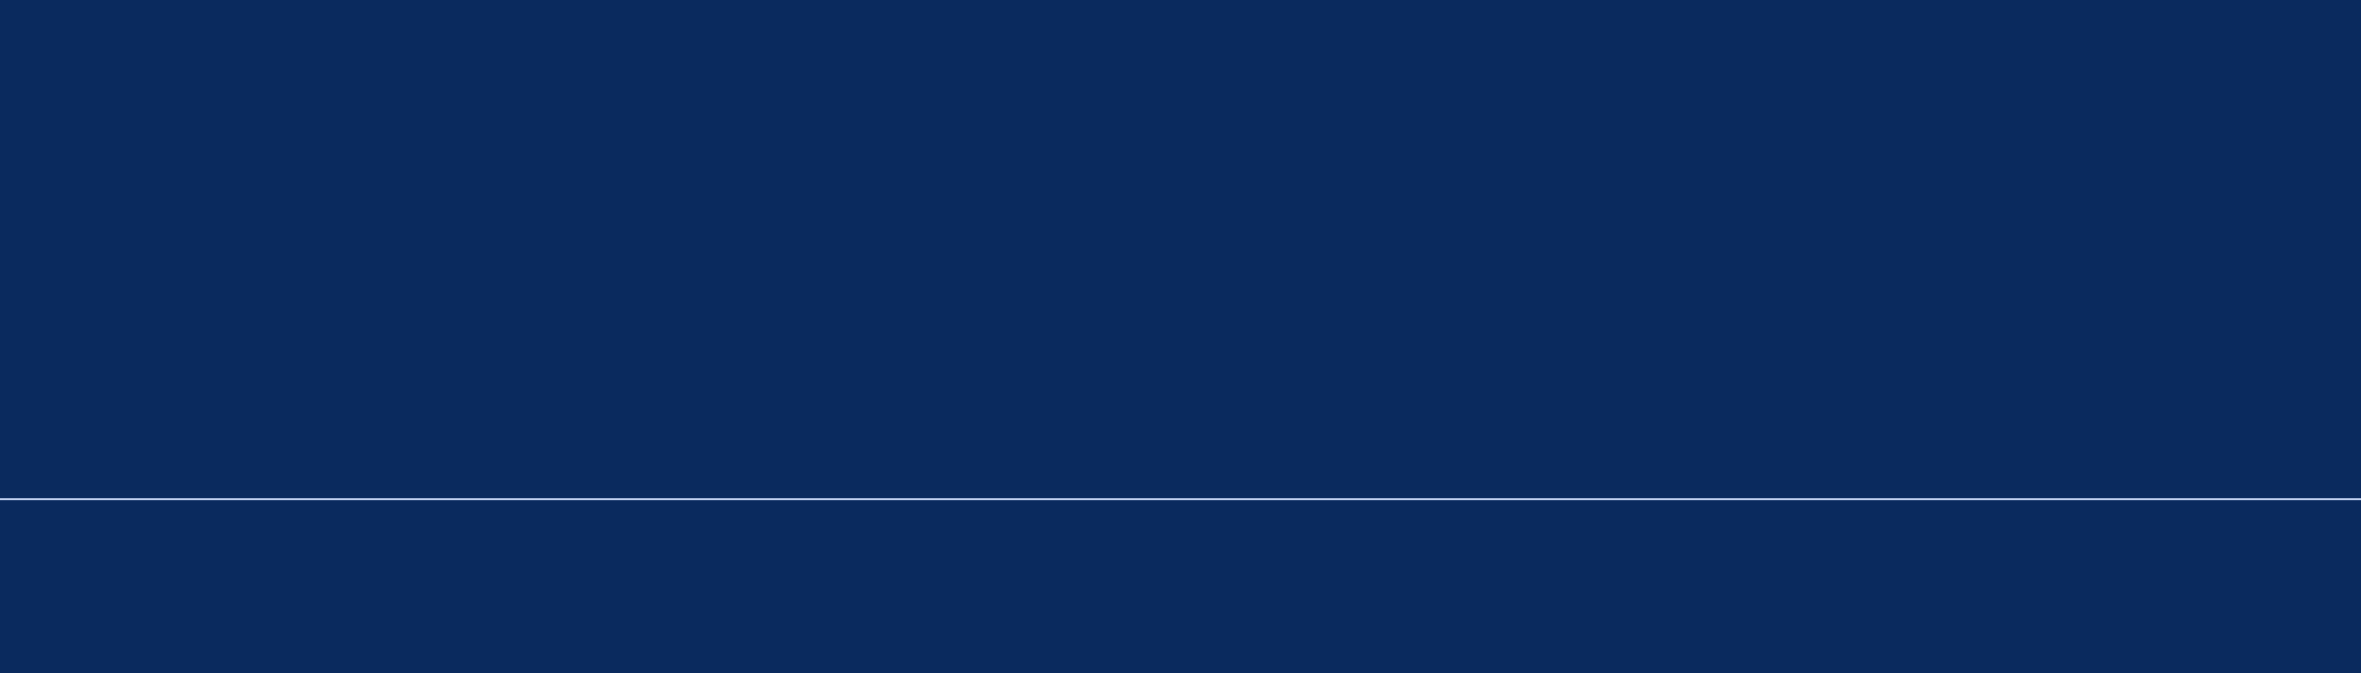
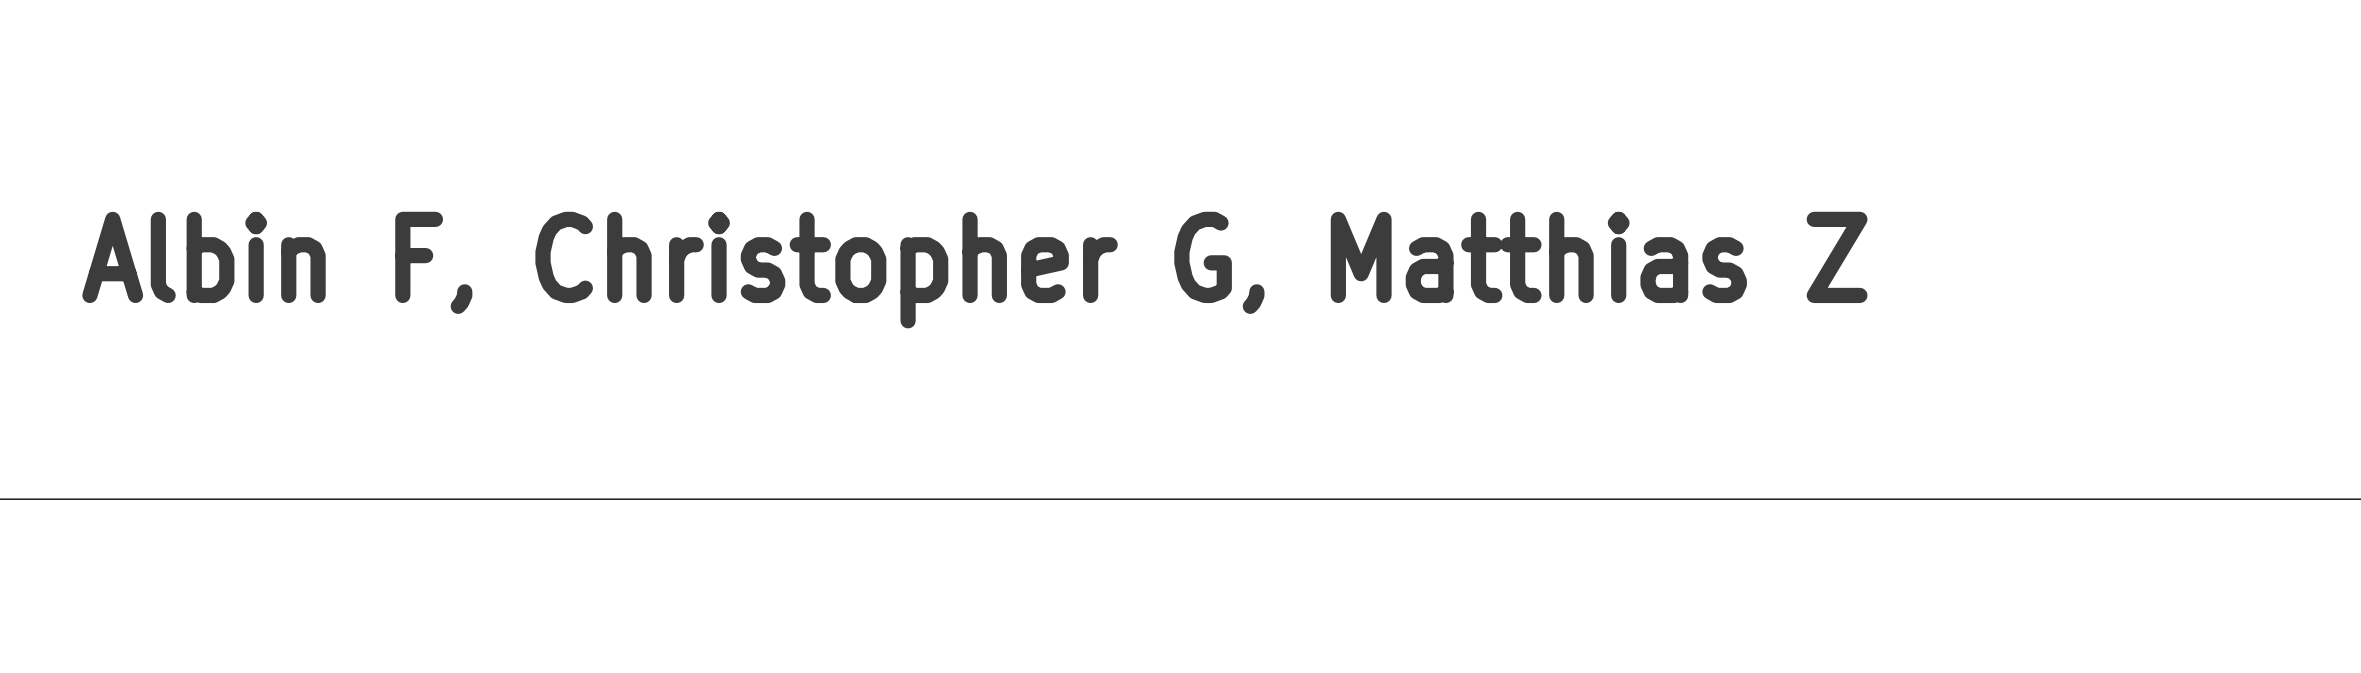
text: none -> Albin F, Christopher G, Matthias Z (974, 270)

